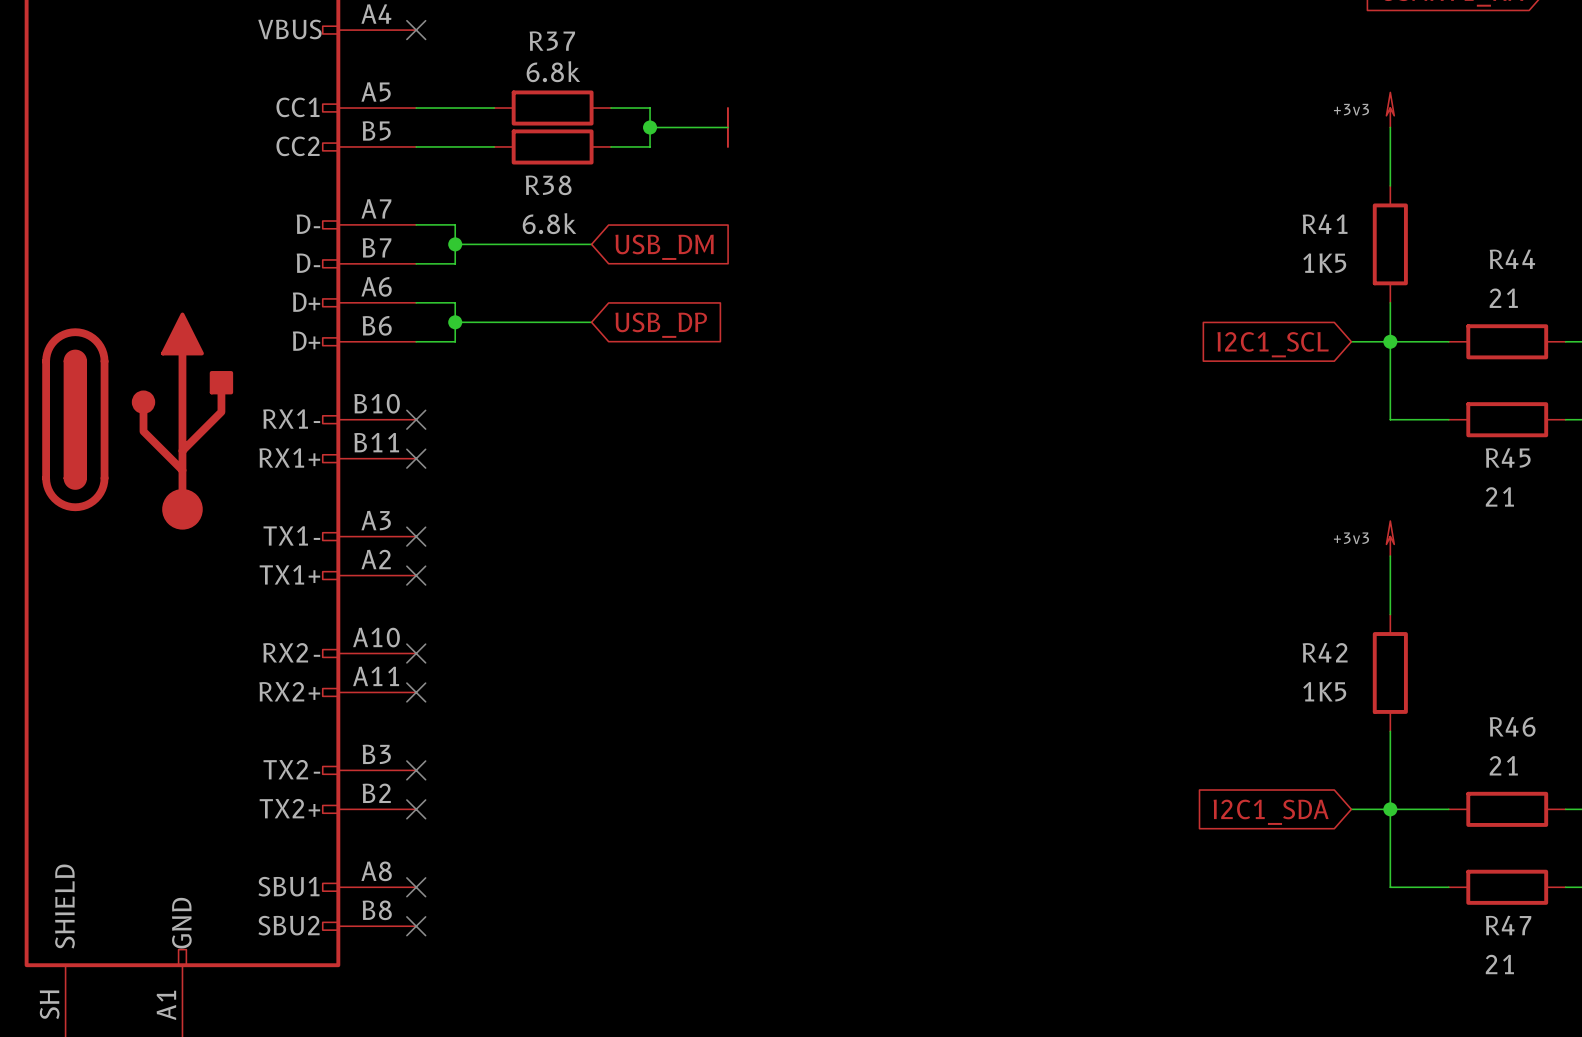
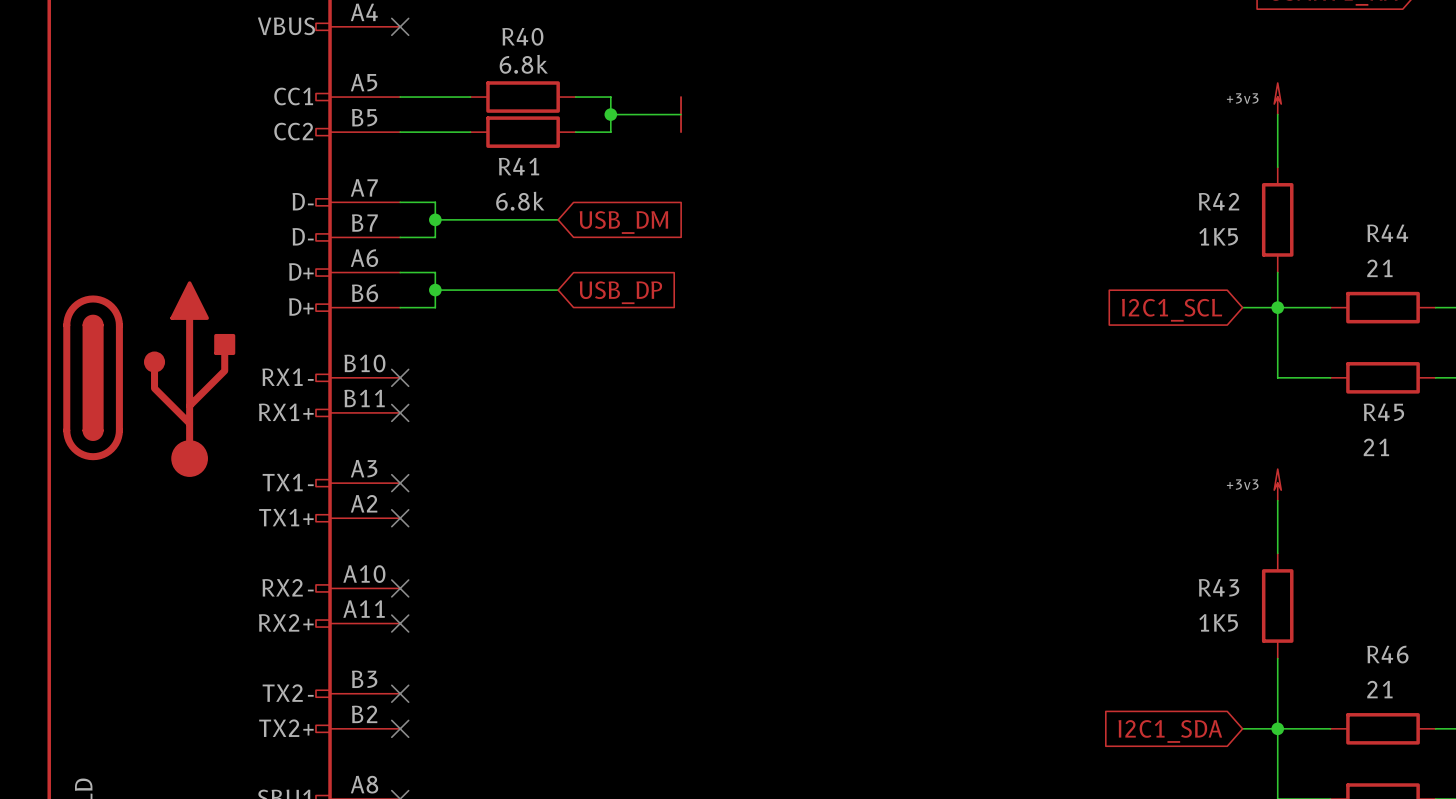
R37 name: R37 (552, 41) -> R40 (522, 36)
R38 name: R38 (548, 185) -> R41 (519, 166)
R41 name: R41 (1325, 224) -> R42 (1219, 201)
R42 name: R42 (1325, 652) -> R43 (1219, 587)

